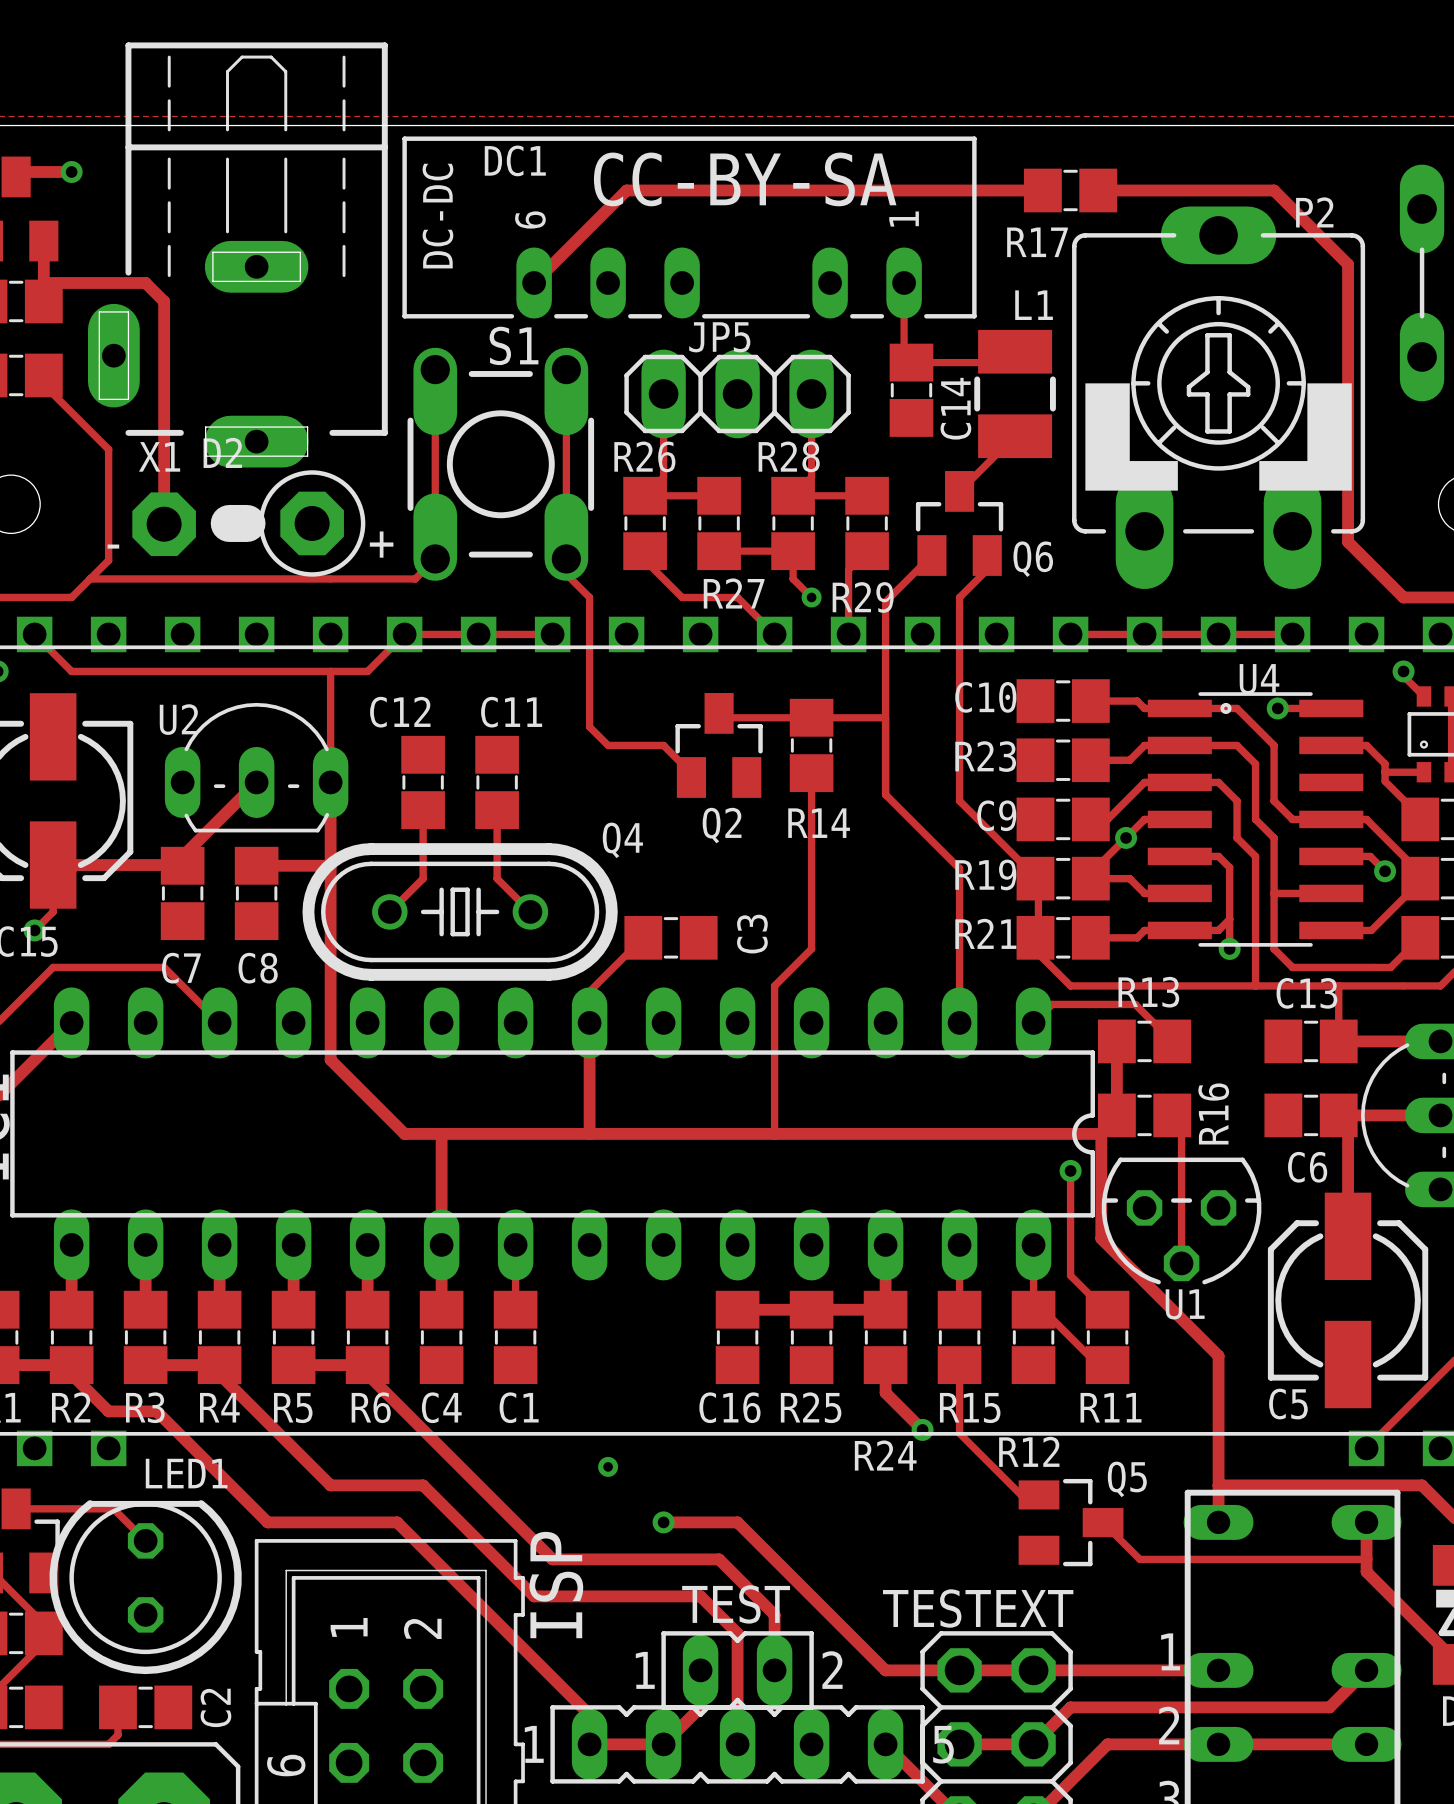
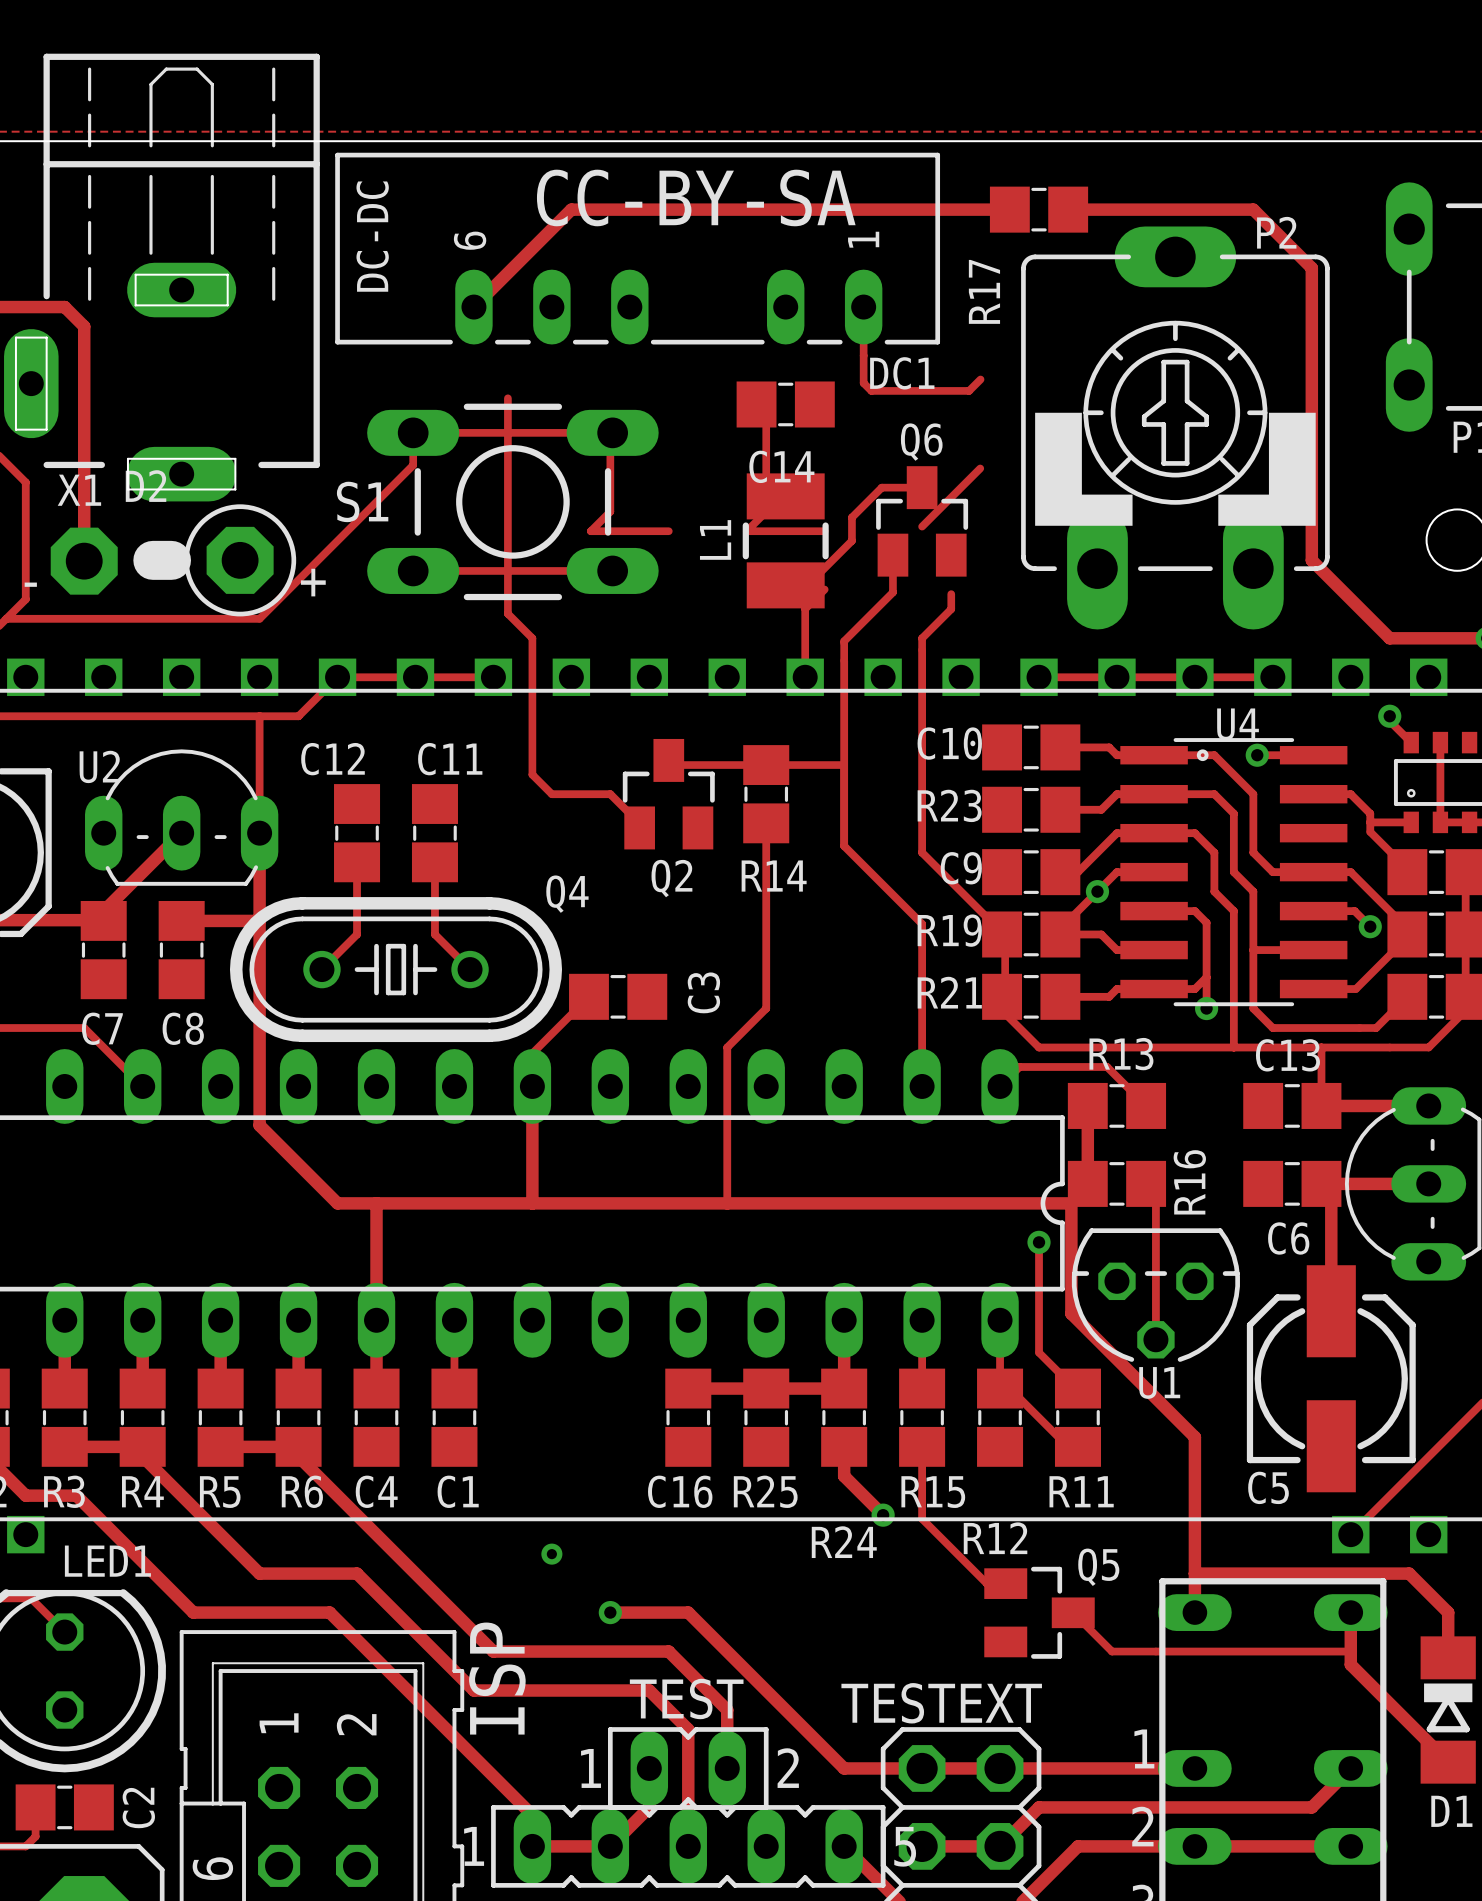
DC1 name position: DC1 (515, 160) -> DC1 (902, 373)
R17 name rotation: 0° (1037, 242) -> 90° counterclockwise (984, 291)
track: (1329, 245) (1348, 264) (1348, 541) -> (1311, 268) (1311, 560) (1331, 579)
L1 name rotation: 0° (1034, 305) -> 90° counterclockwise (715, 539)
L1 name position: L1 (1034, 305) -> L1 (715, 539)
S1 name position: S1 (514, 345) -> S1 (362, 501)
S1 footprint: [407, 347, 595, 581] -> [367, 403, 659, 601]
track: (435, 369) (435, 558) (415, 578) (330, 578) -> (612, 432) (413, 432) (413, 465) (259, 618)
C14 rotation: 0° (911, 390) -> 90° clockwise (785, 404)
C14 position: (911, 390) -> (785, 404)
JP5: (737, 393) -> none
L1 position: (1015, 393) -> (785, 540)
P2 position: (1218, 397) -> (1175, 427)
track: none -> (922, 487) (881, 487) (851, 517) (851, 540) (807, 585) (785, 585)
R26: (645, 523) -> none
R27: (719, 523) -> none
R28: (793, 523) -> none
R29: (867, 523) -> none
Q6 position: (959, 523) -> (922, 521)
track: none -> (413, 570) (612, 570)
track: (645, 551) (645, 560) (682, 597) (737, 597) (774, 634) -> none
track: (719, 551) (793, 551) (793, 578) (811, 597) -> none
track: (931, 555) (885, 601) -> (892, 555) (892, 592) (844, 642)
Q6 name position: Q6 (1033, 559) -> Q6 (921, 442)
via: (811, 597) -> none

